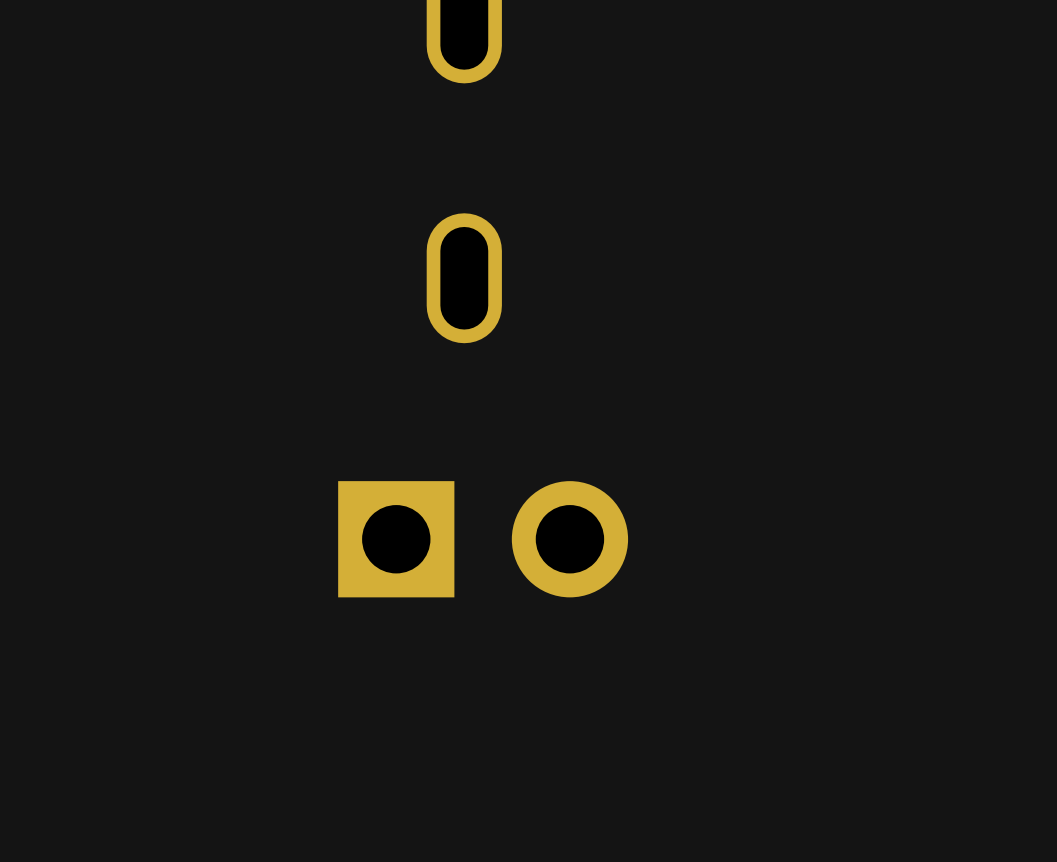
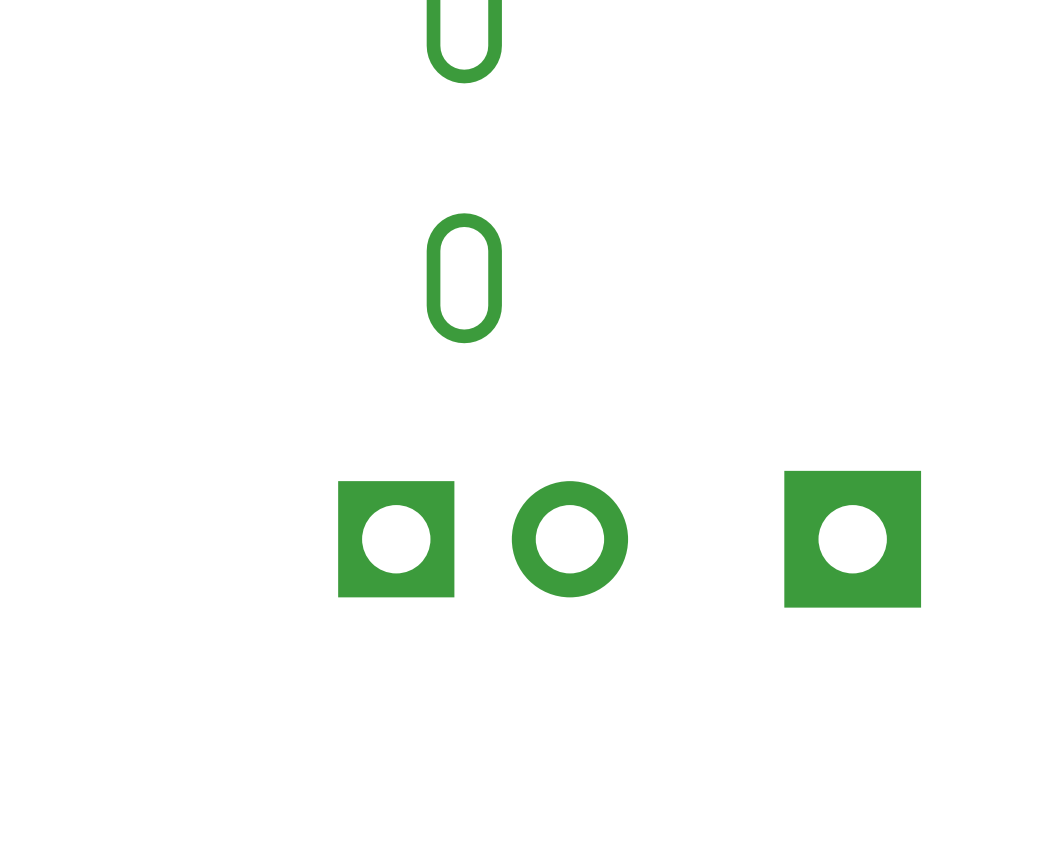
part: none -> (852, 539)

